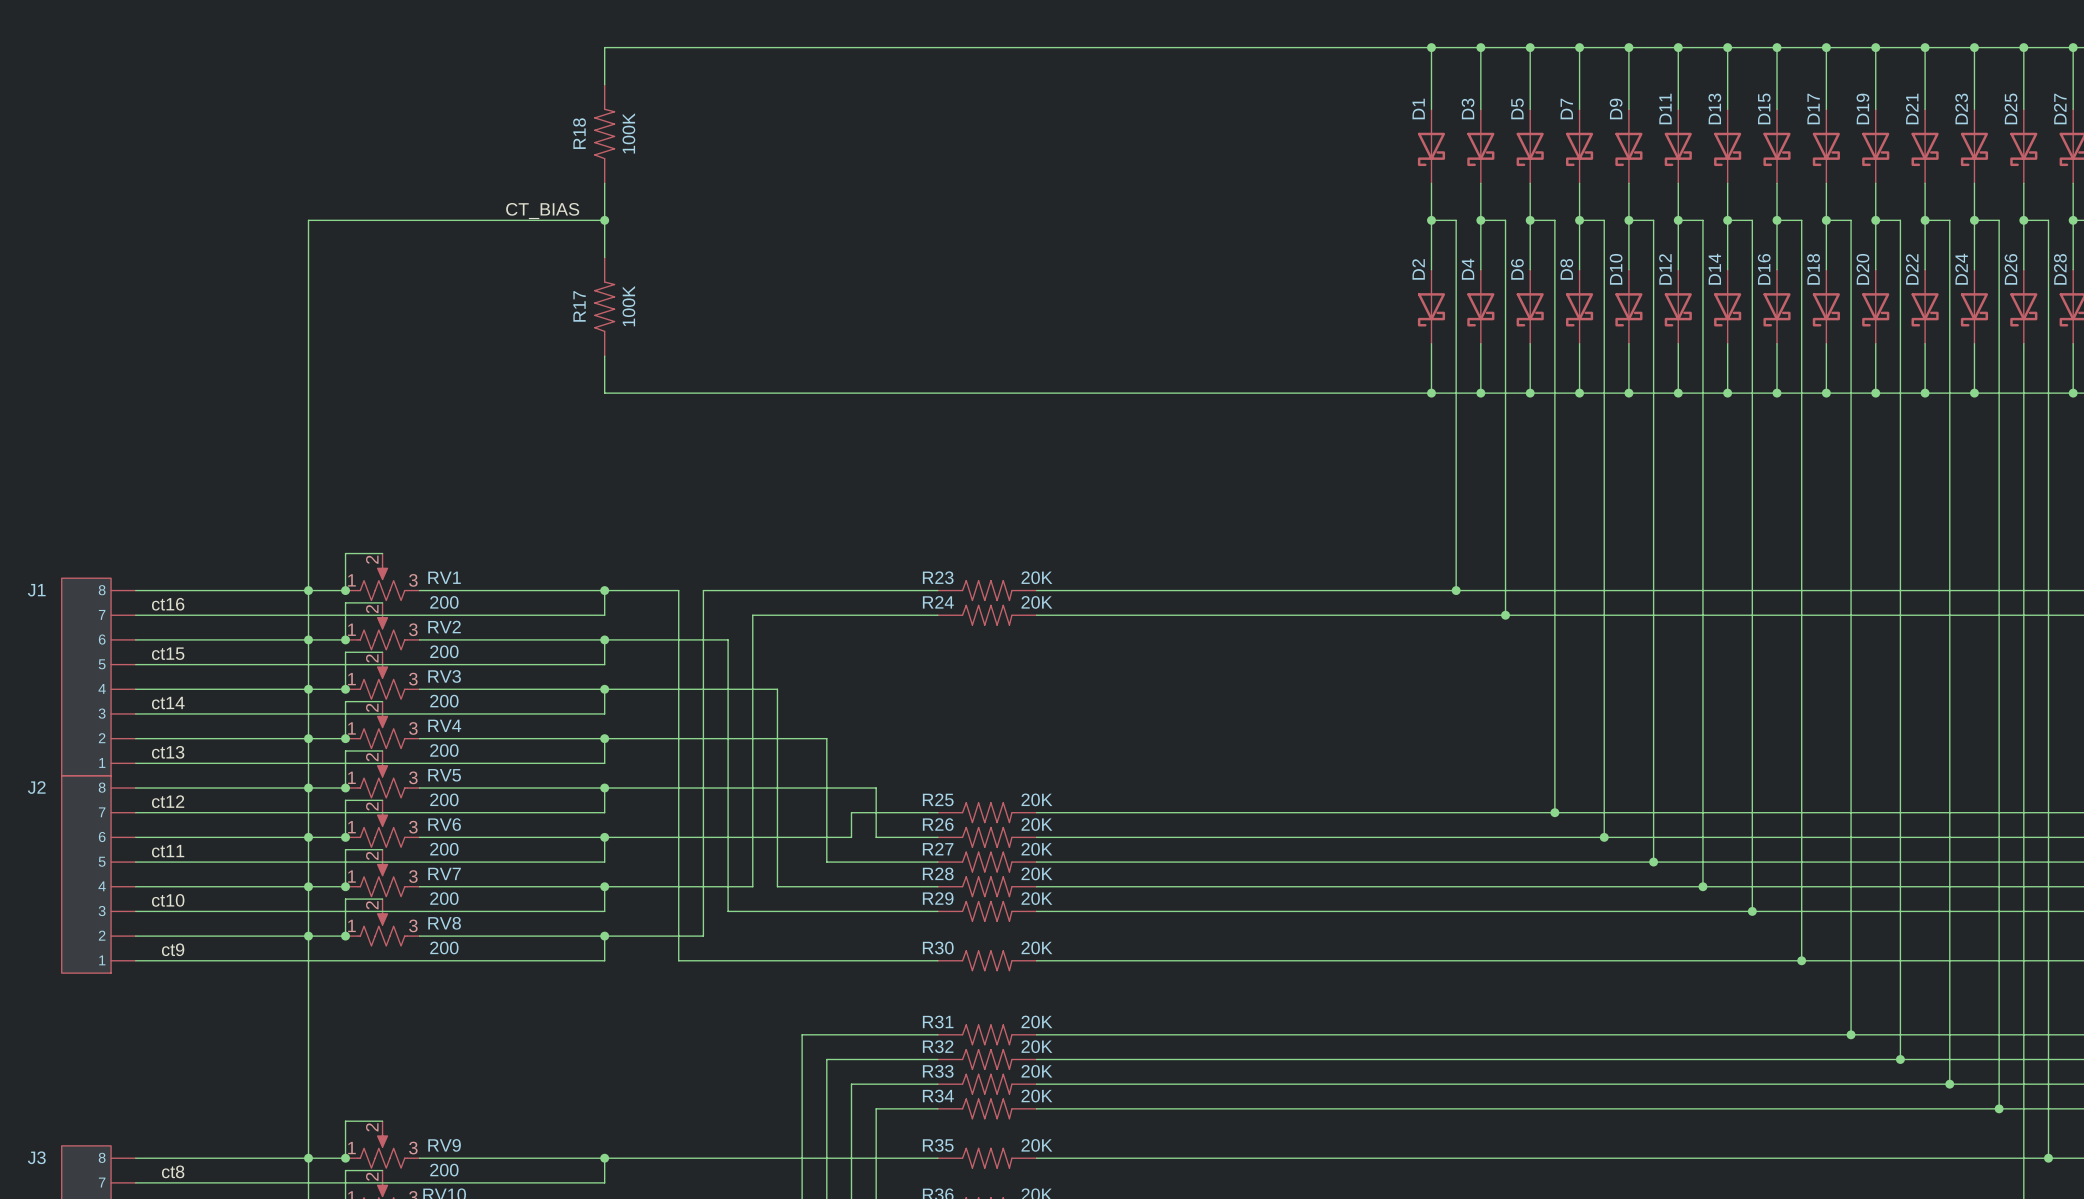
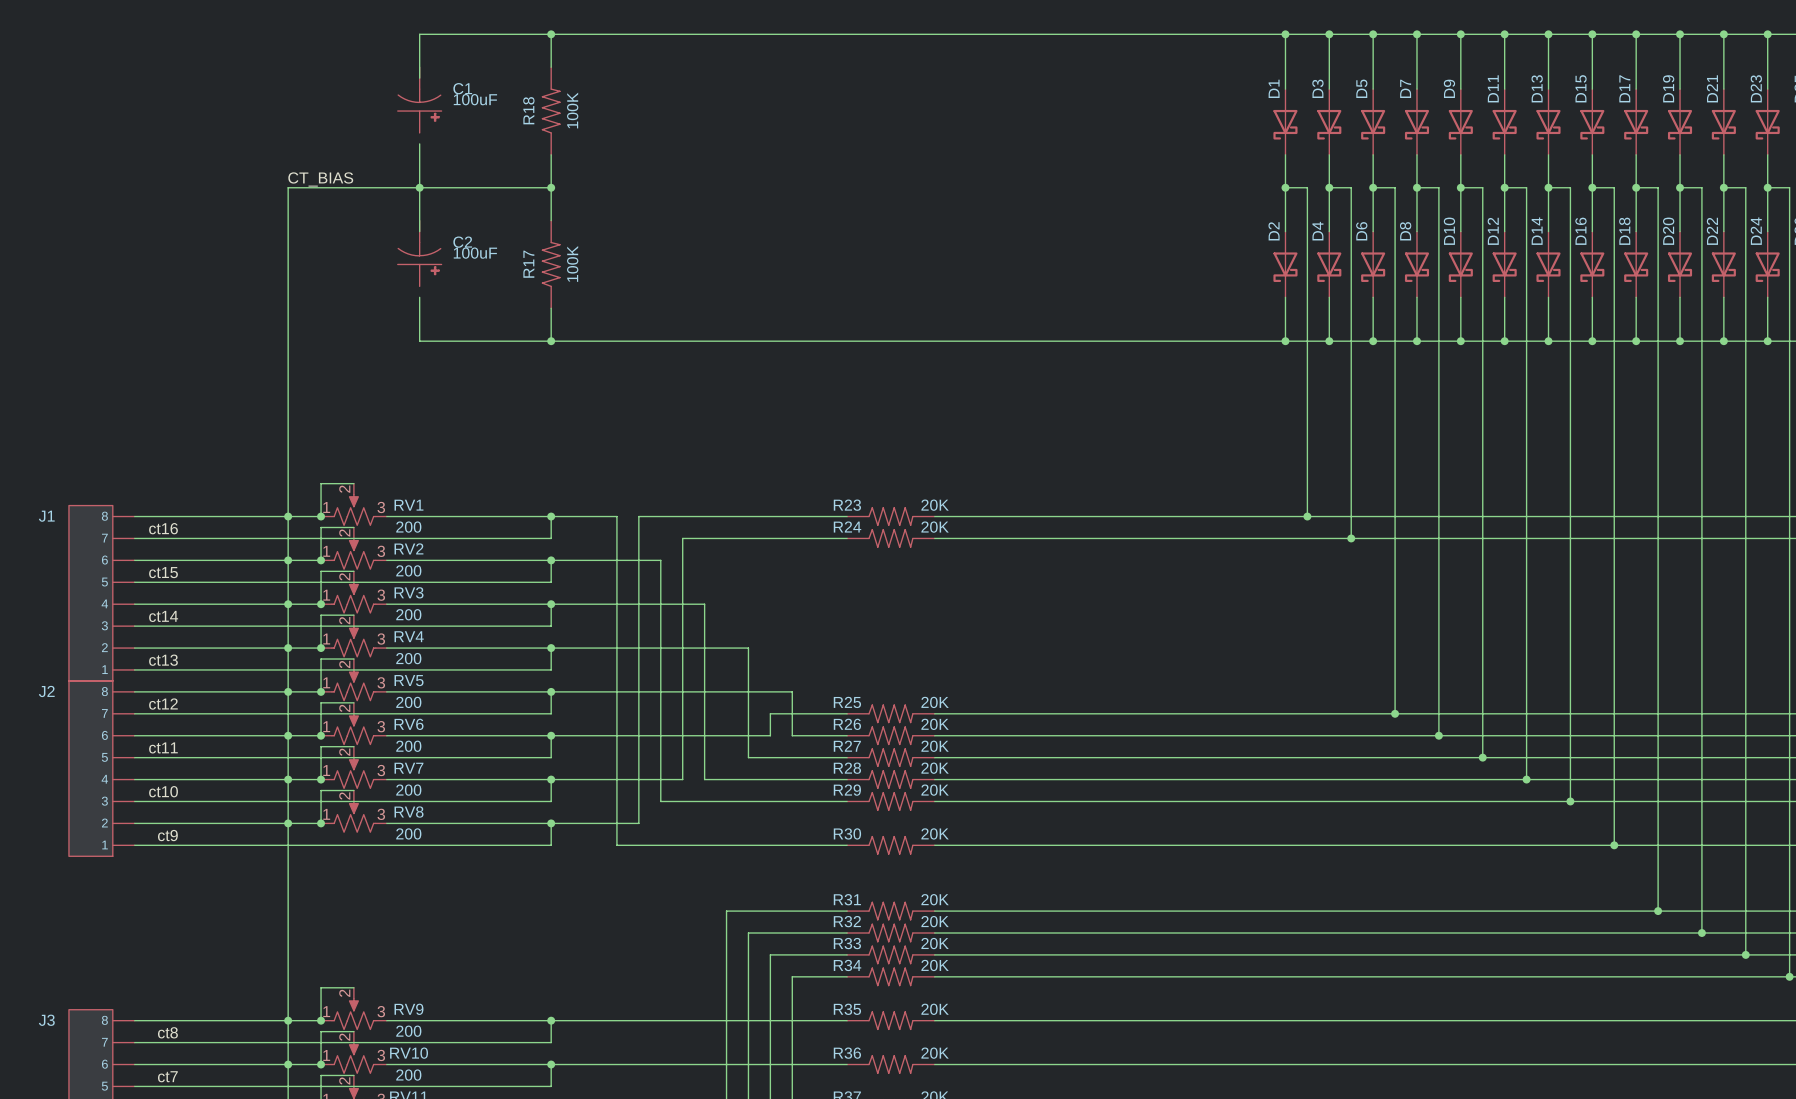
wire: none -> (551, 34) (419, 34) (419, 78)
junction: none -> (551, 34)
C1: none -> 100uF (419, 100)
wire: none -> (419, 143) (419, 231)
label position: CT_BIAS (542, 211) -> CT_BIAS (320, 179)
junction: none -> (419, 187)
C2: none -> 100uF (419, 253)
wire: none -> (419, 297) (419, 341) (551, 341)
junction: none -> (551, 341)

